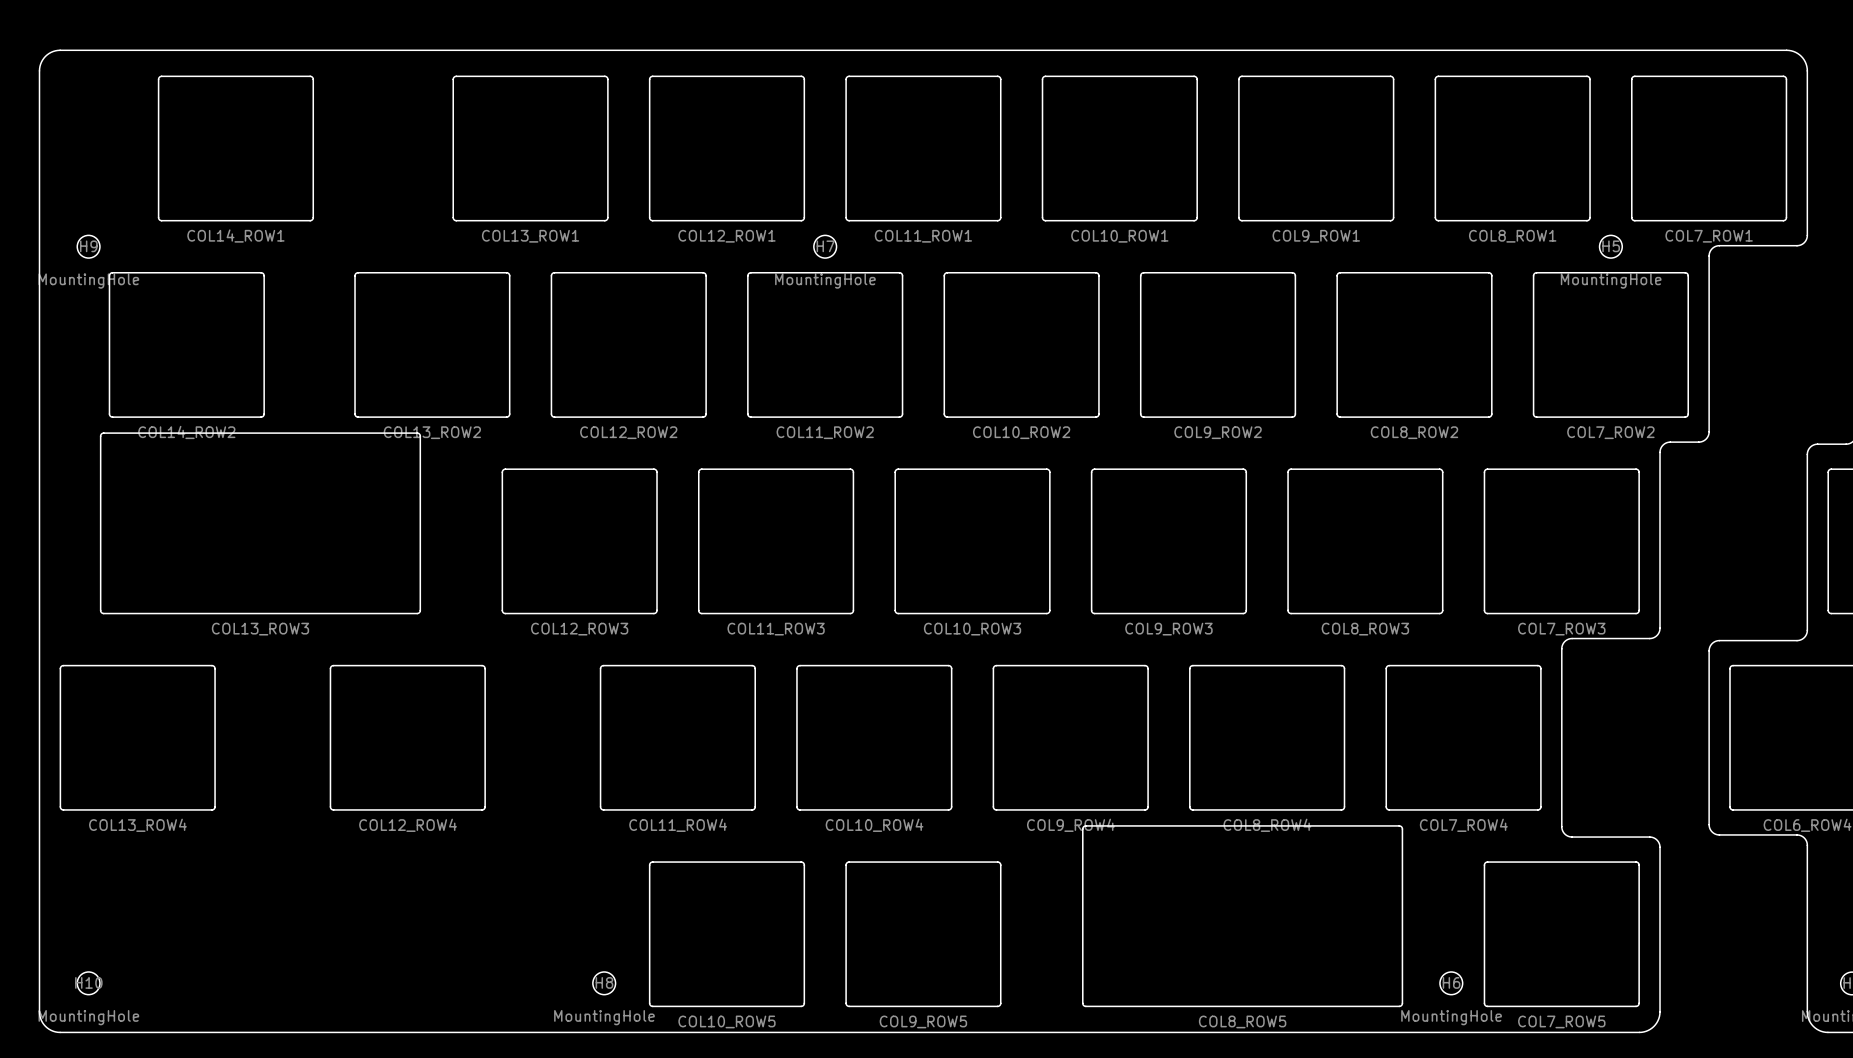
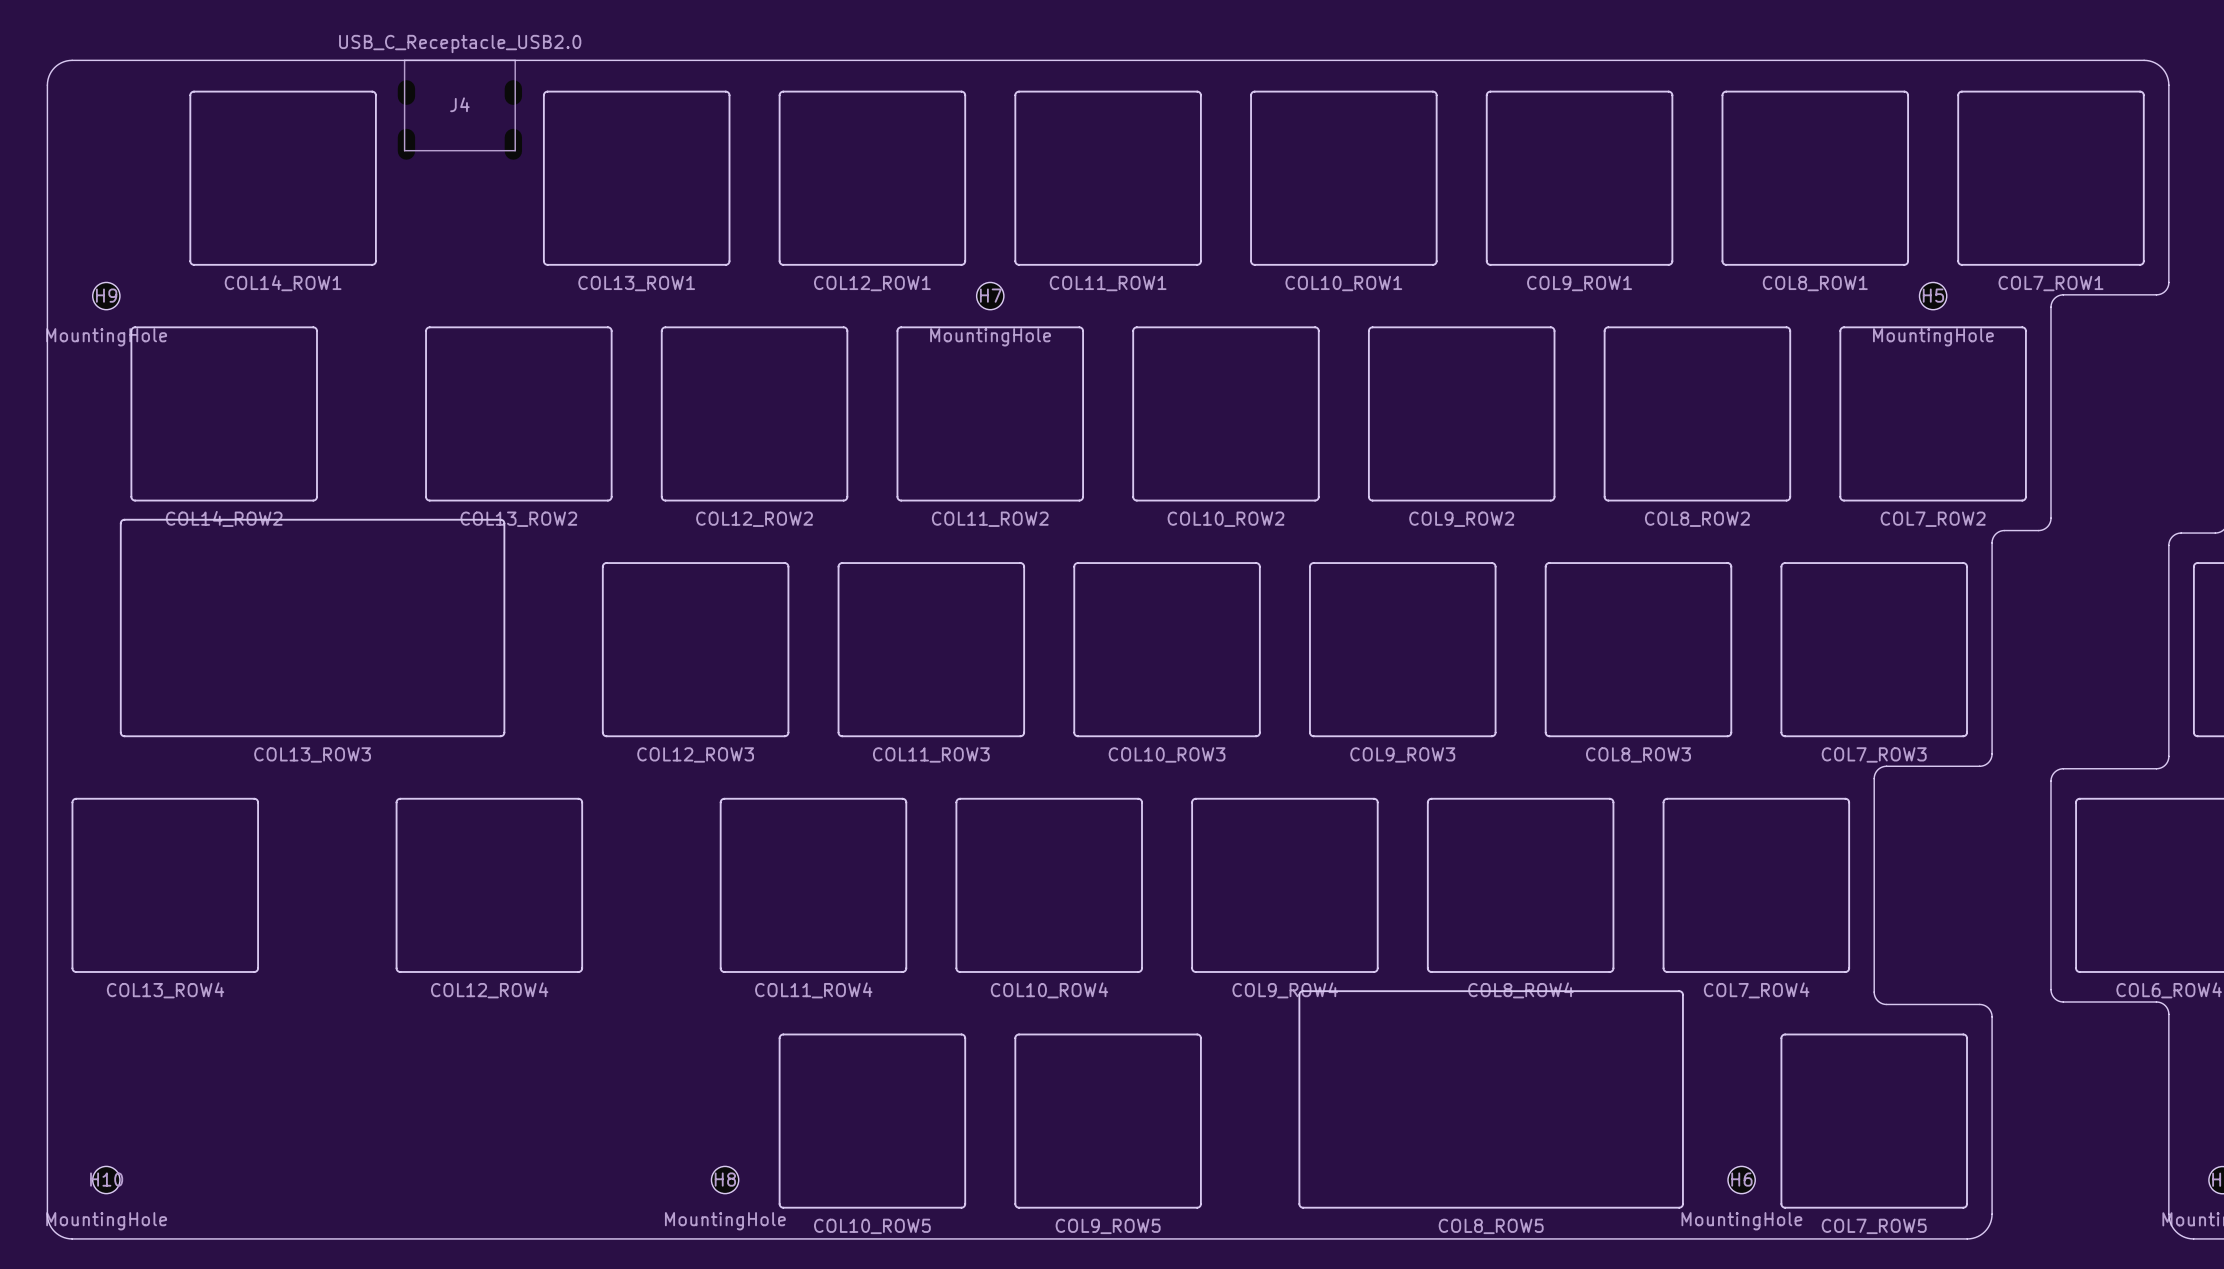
J4: none -> USB_C_Receptacle_USB2.0 (459, 109)

